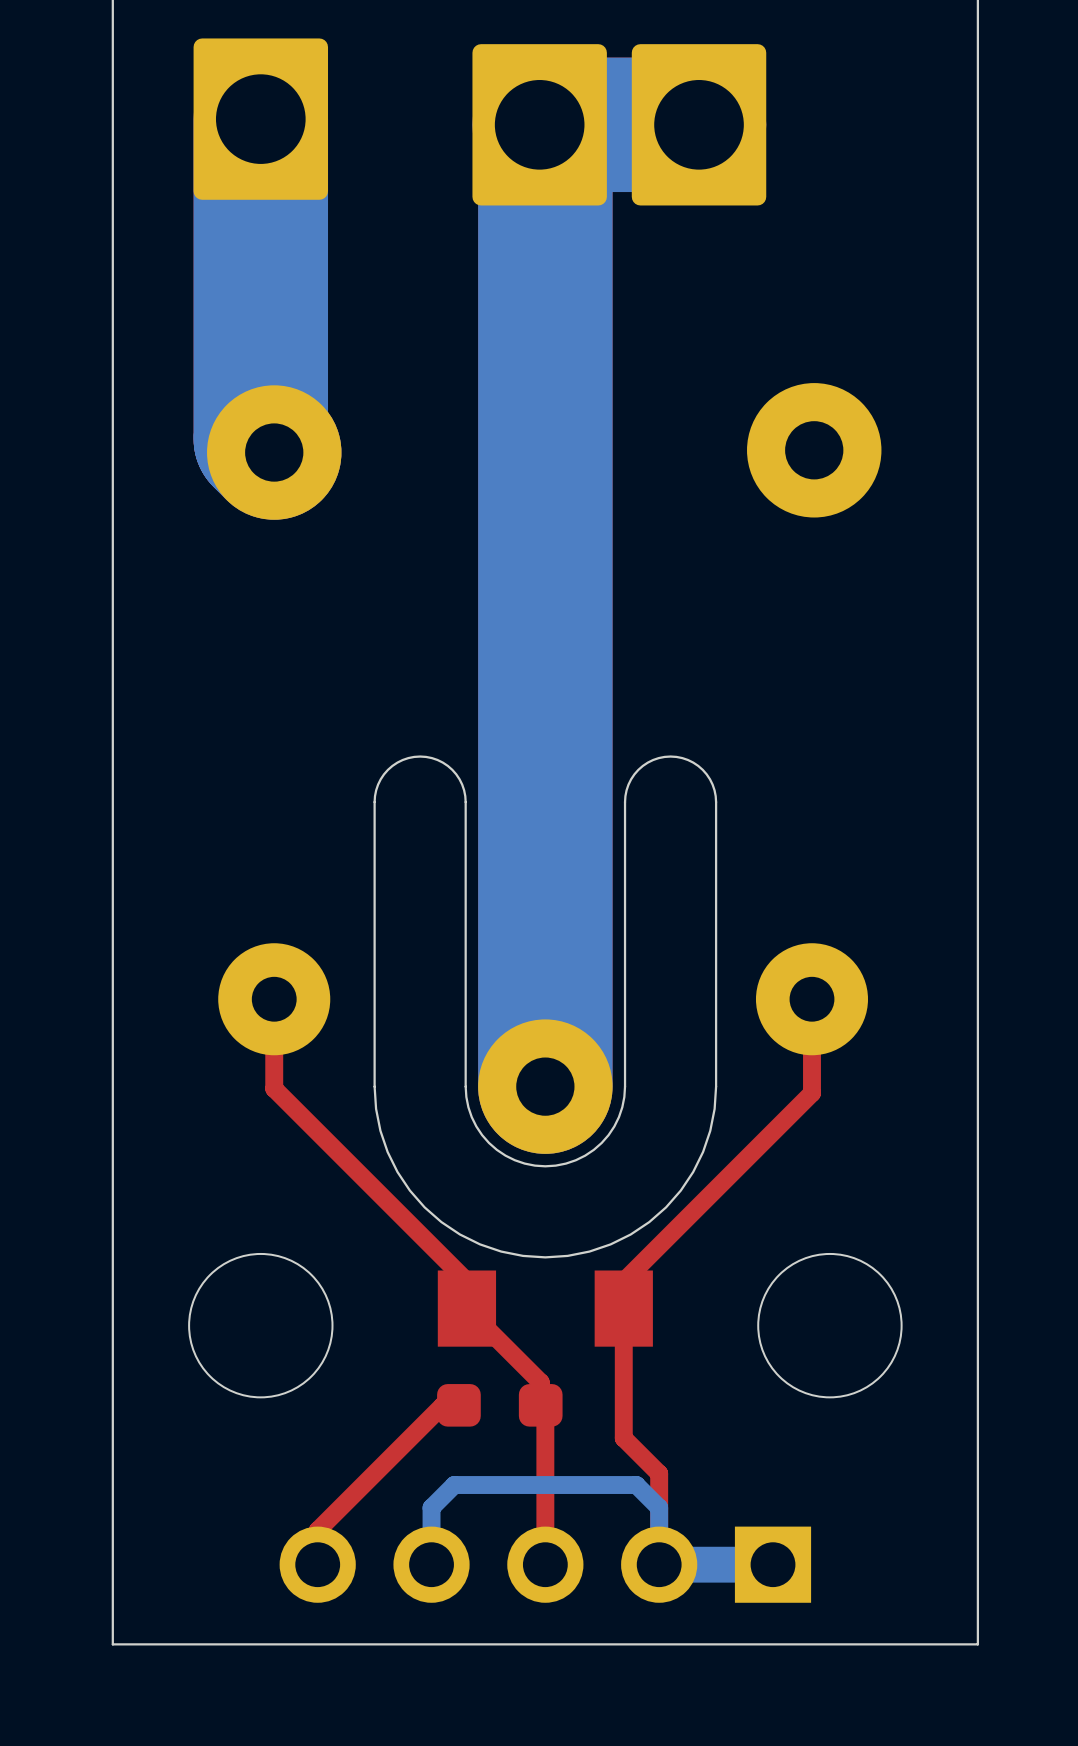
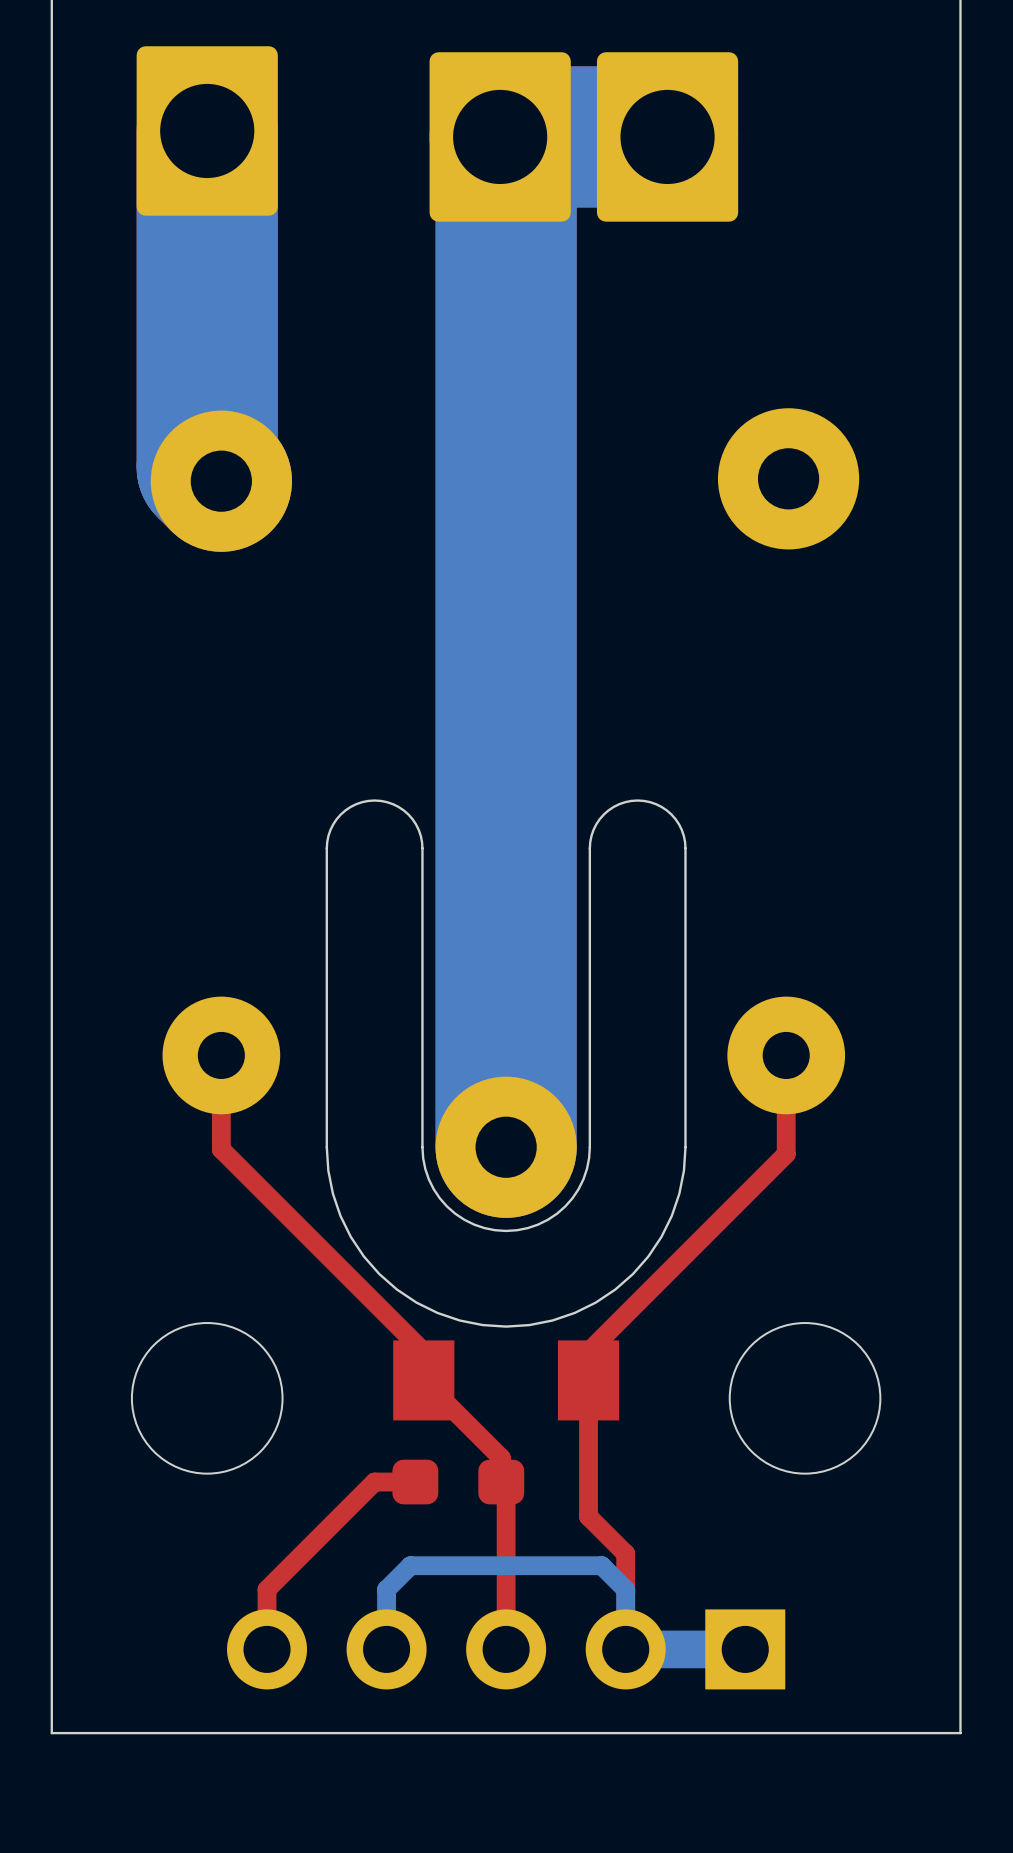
top track: (442, 1405) (317, 1530) -> (398, 1482) (374, 1482) (267, 1589) (267, 1613)

